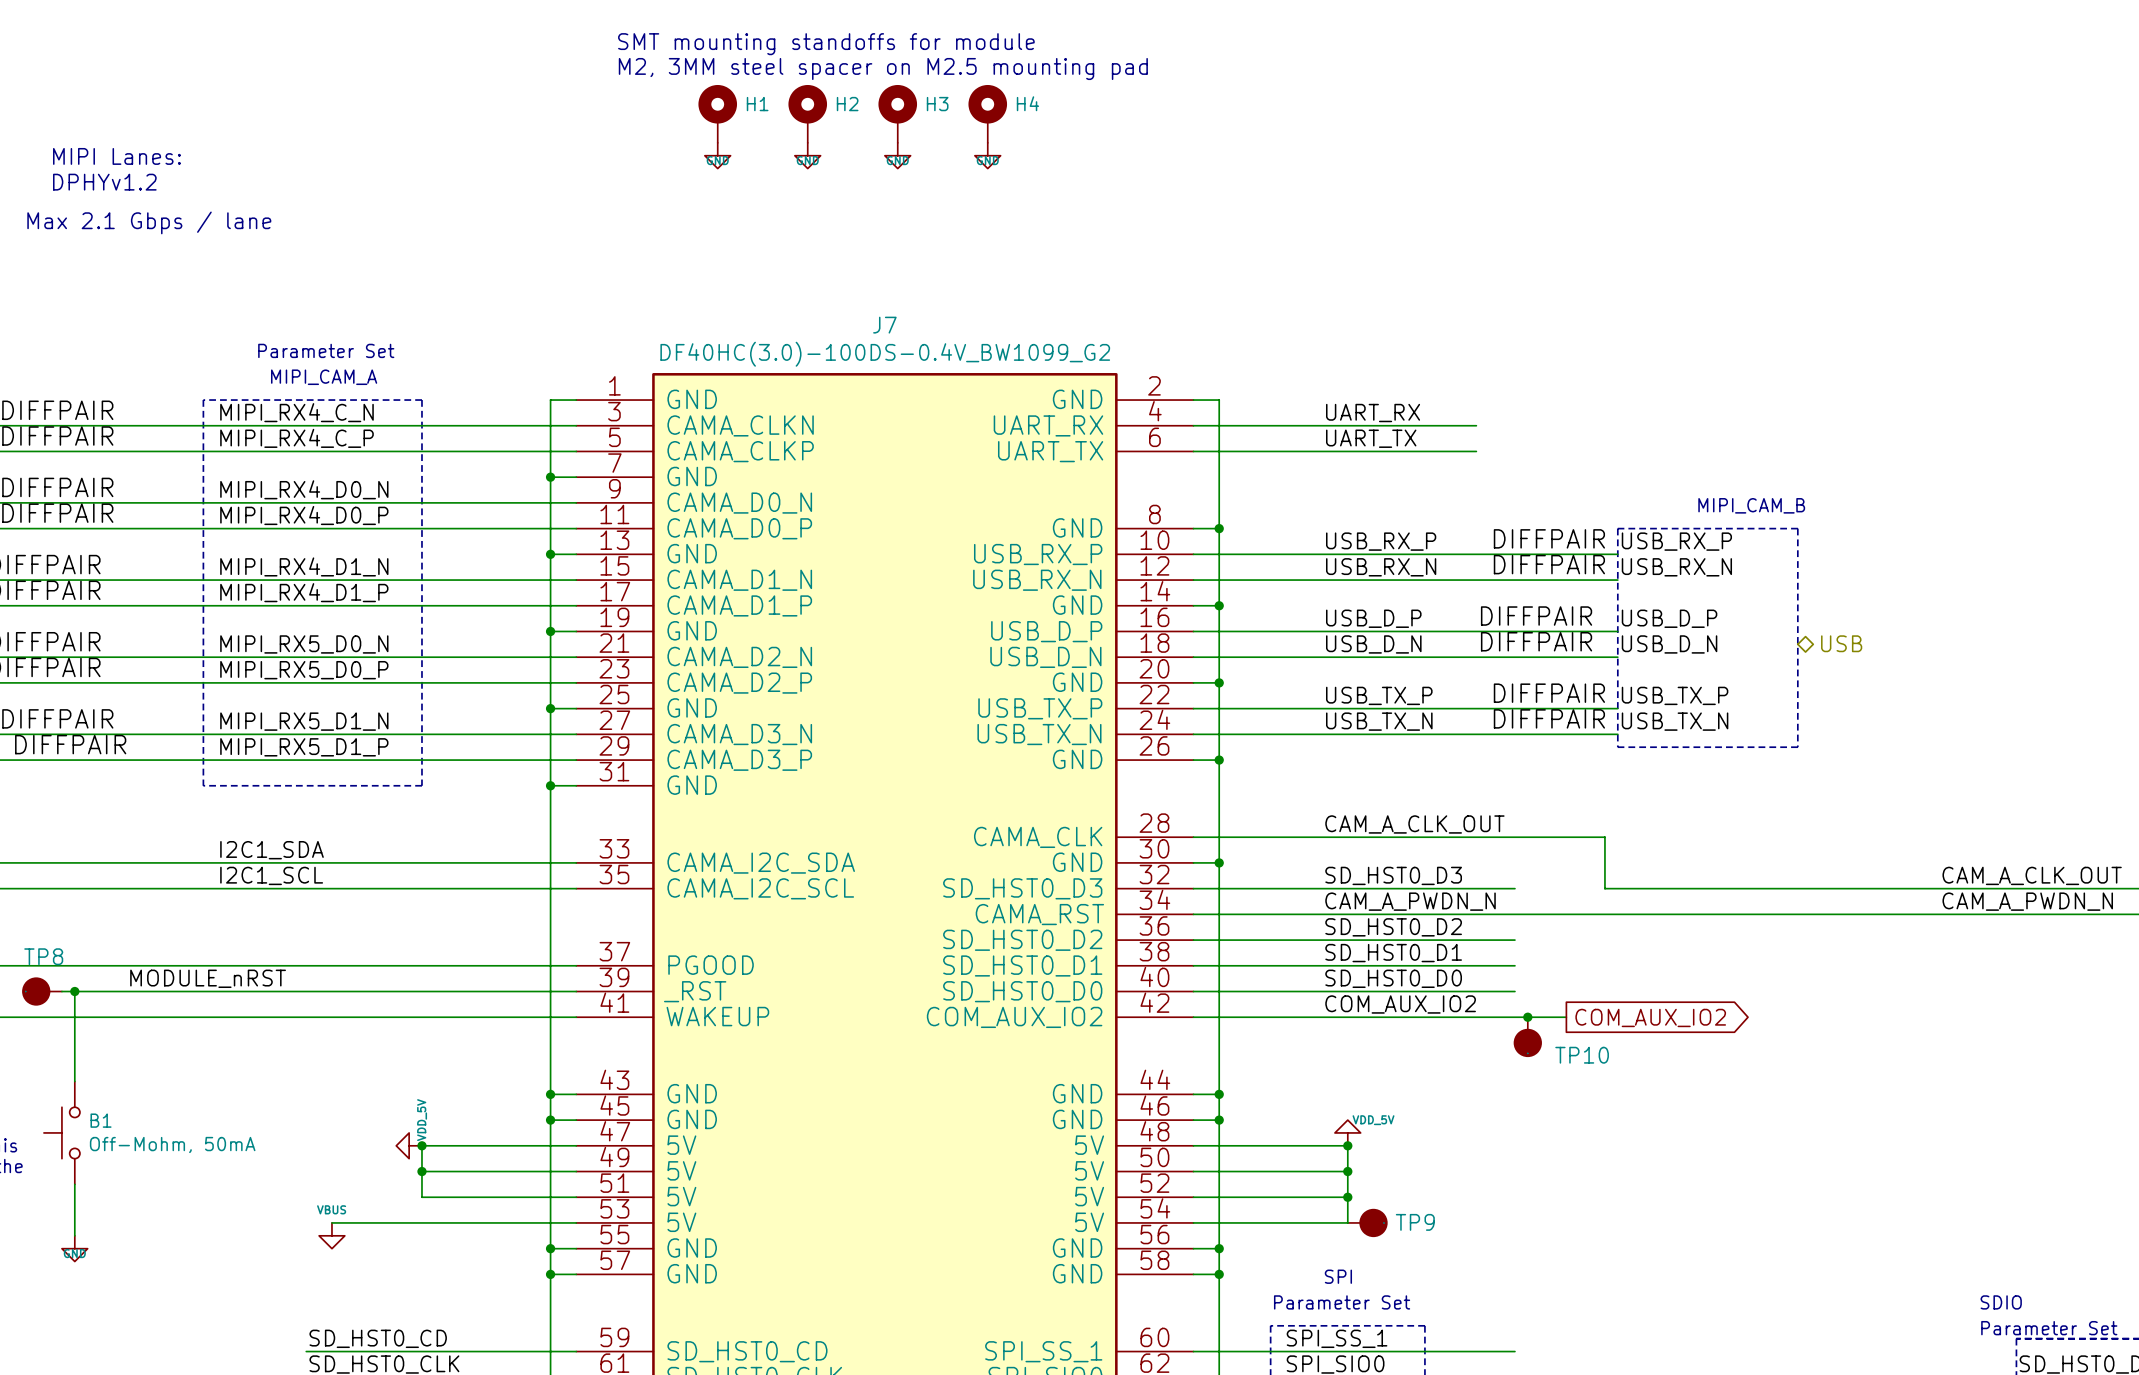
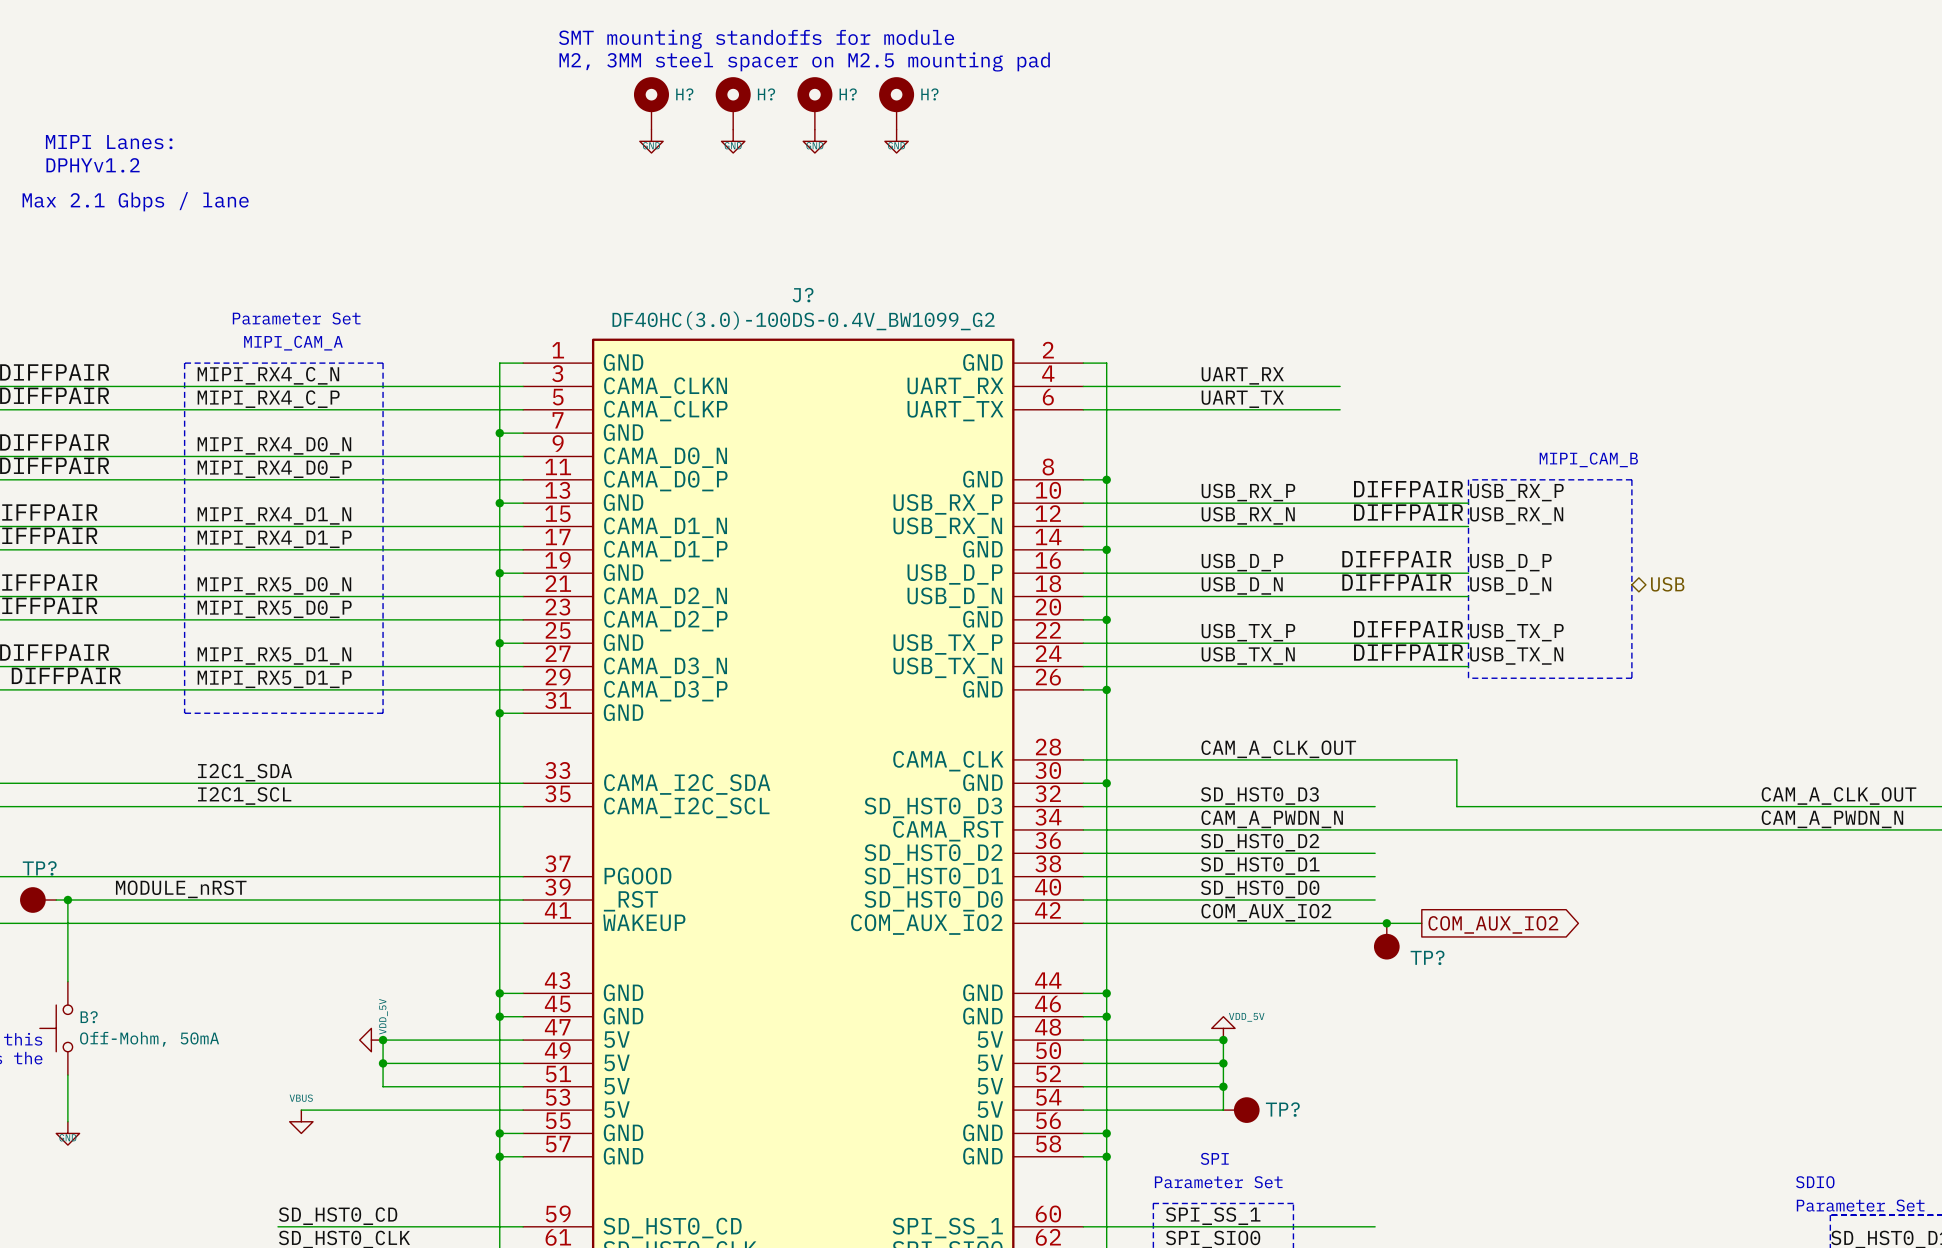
H4 name: H4 (1027, 103) -> H? (929, 94)
H1 name: H1 (757, 104) -> H? (684, 94)
H2 name: H2 (847, 104) -> H? (766, 94)
H3 name: H3 (937, 104) -> H? (848, 94)
J7 name: J7 (884, 325) -> J? (803, 295)
TP8 name: TP8 (43, 956) -> TP? (39, 868)
TP10 name: TP10 (1582, 1055) -> TP? (1427, 957)
B1 name: B1 (101, 1120) -> B? (89, 1017)
TP9 name: TP9 (1415, 1222) -> TP? (1282, 1109)

